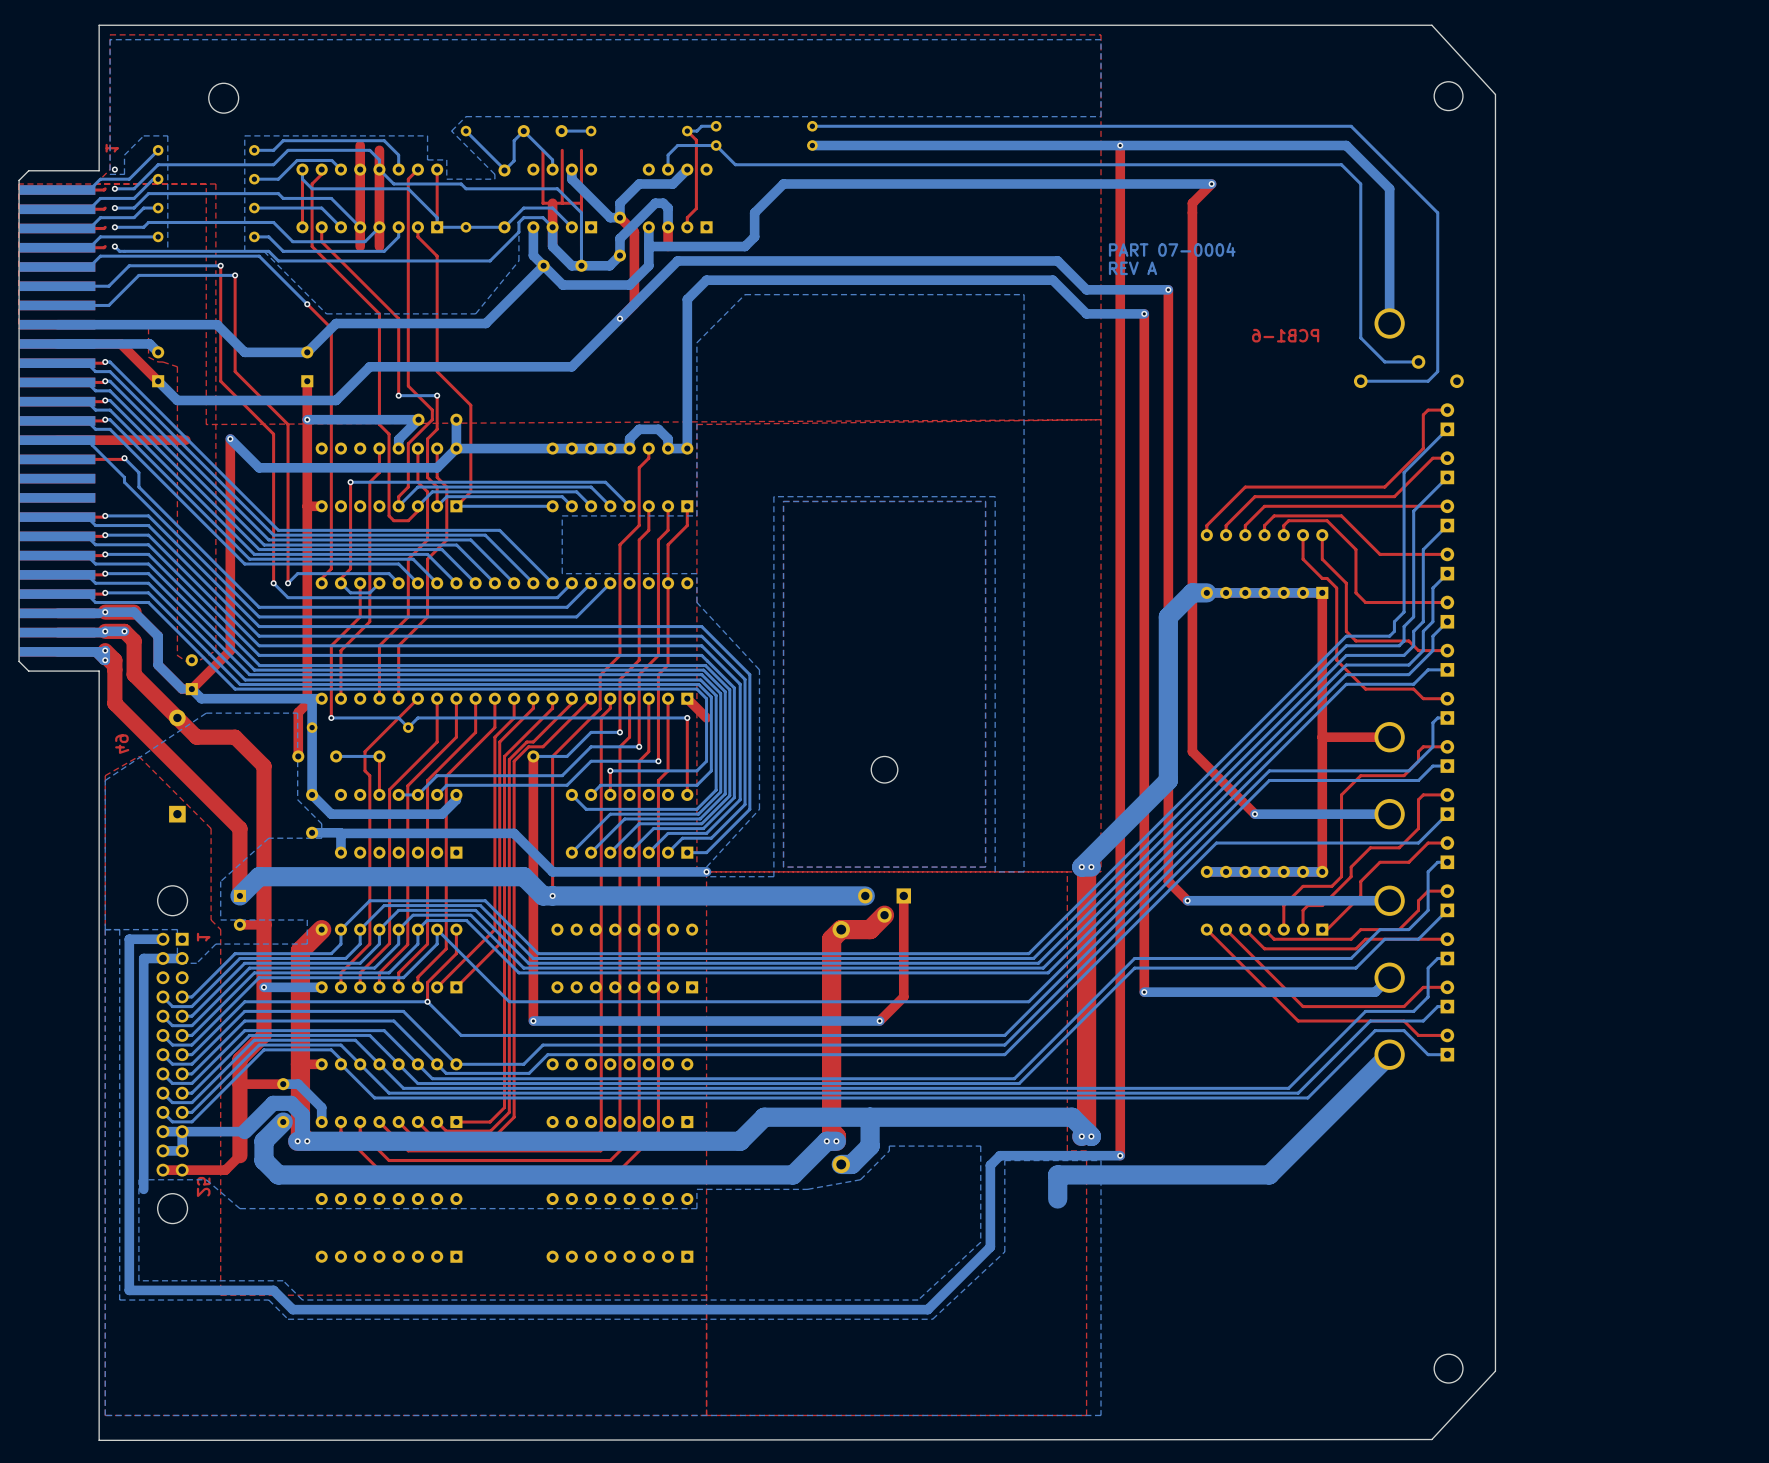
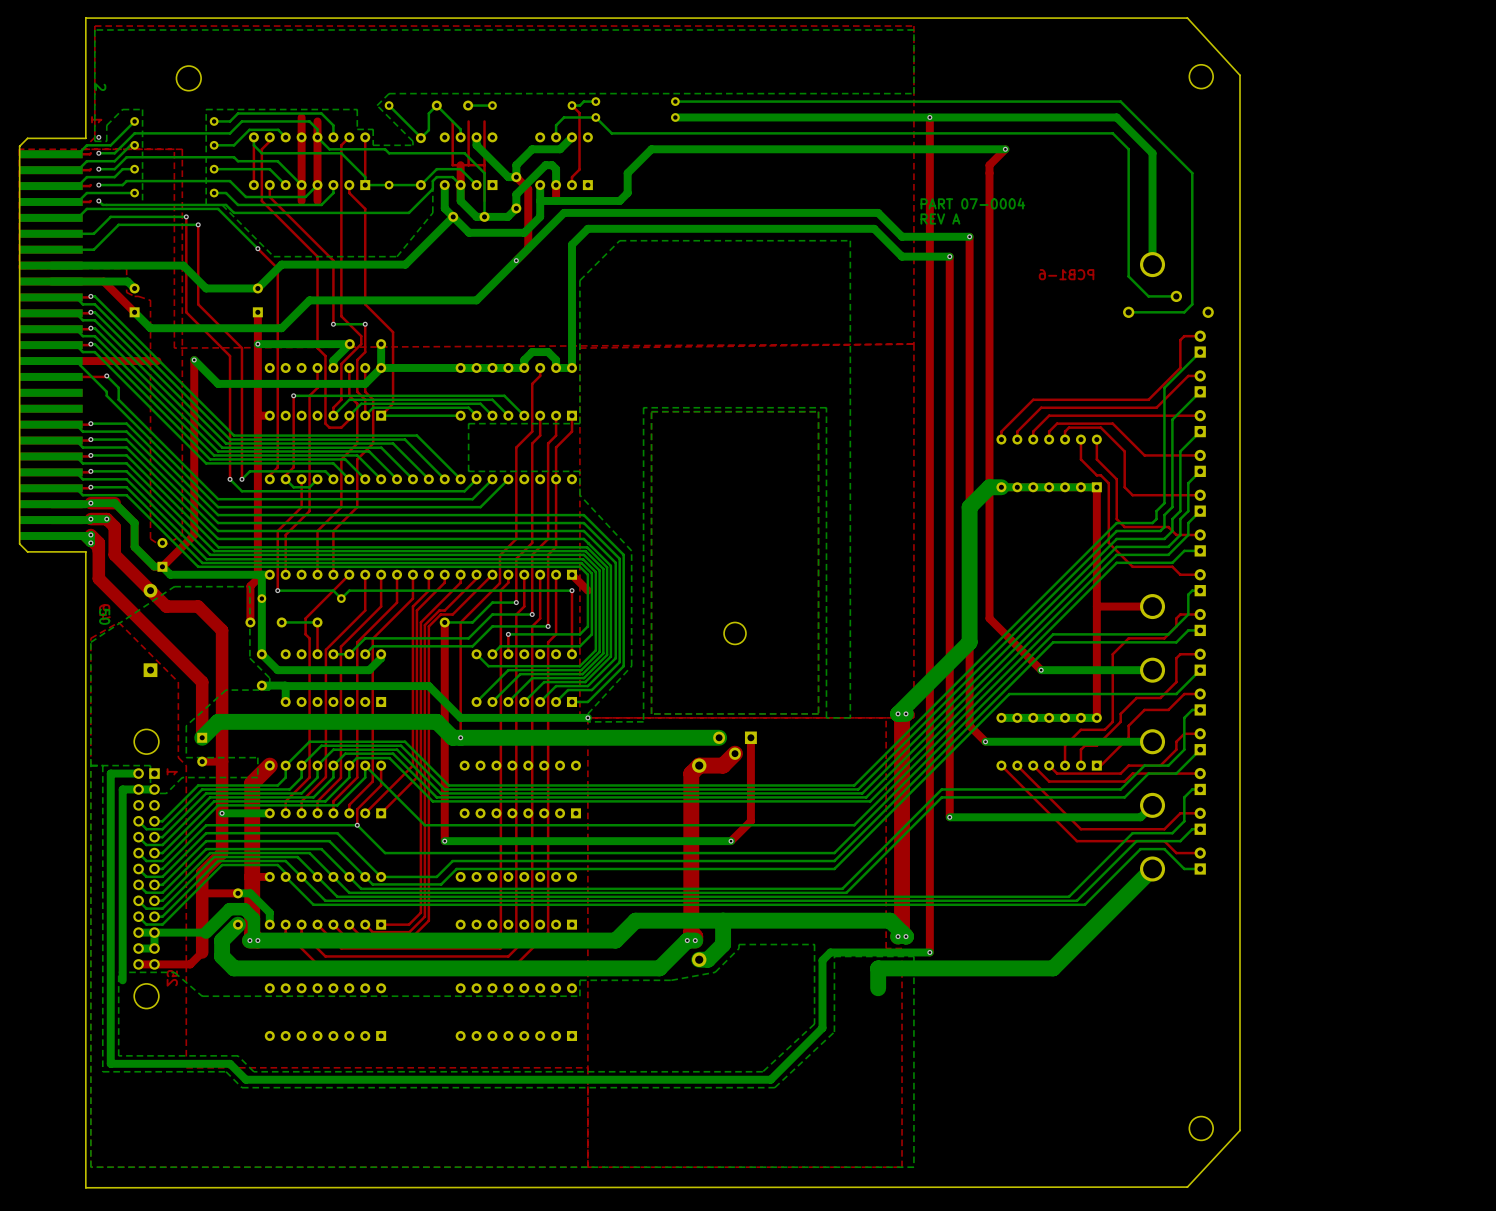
text: none -> 2 (100, 87)
text: none -> 50 (104, 616)

